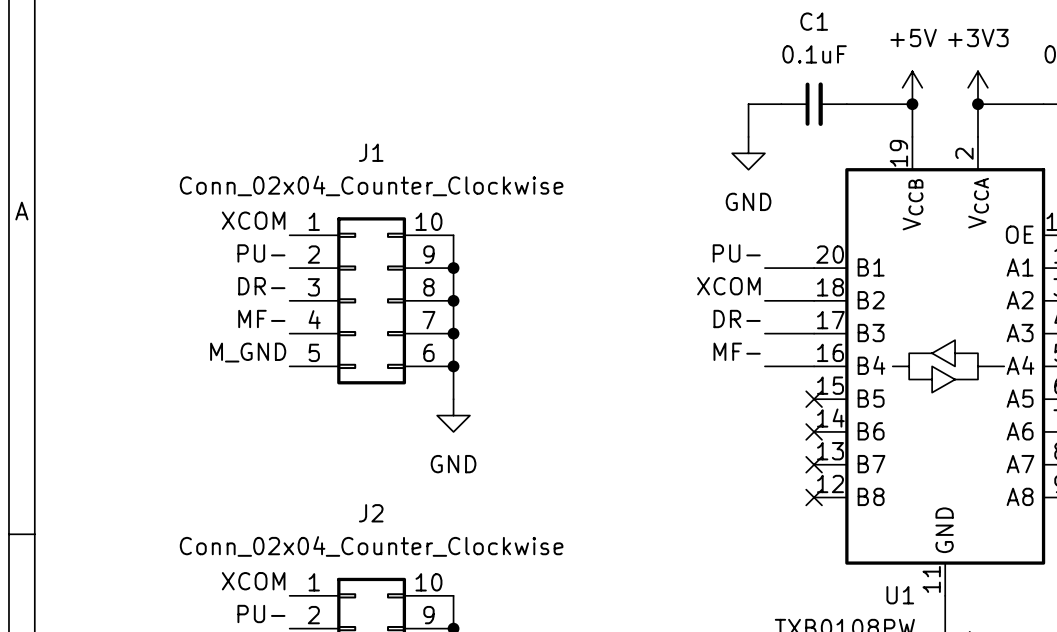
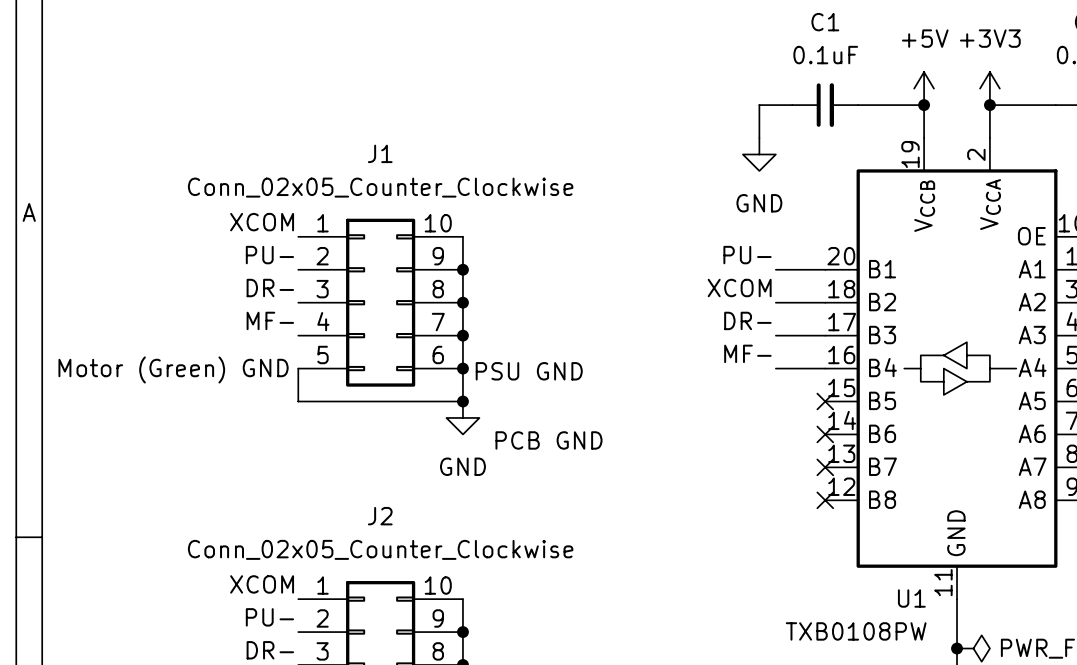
J1 value: Conn_02x04_Counter_Clockwise (371, 185) -> Conn_02x05_Counter_Clockwise (380, 187)
label: M_GND (248, 352) -> none
wire: none -> (298, 368) (298, 401) (462, 401)
text: none -> Motor (Green) GND (173, 369)
text: none -> PSU GND (529, 371)
junction: none -> (462, 401)
text: none -> PCB GND (549, 440)
J2 value: Conn_02x04_Counter_Clockwise (371, 546) -> Conn_02x05_Counter_Clockwise (380, 549)

